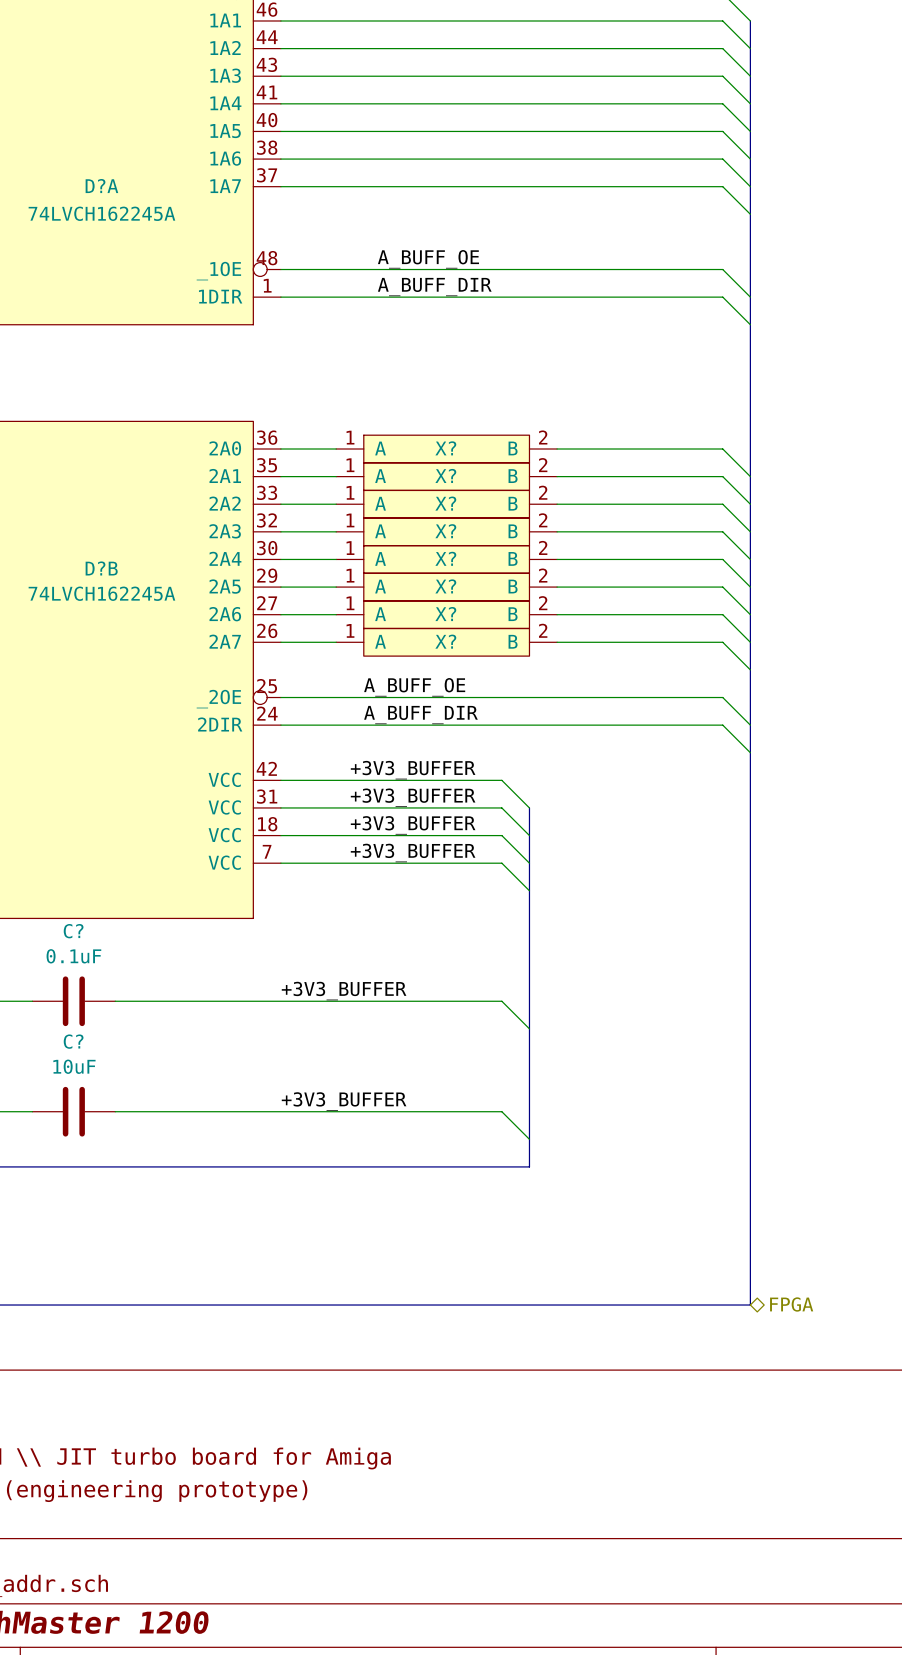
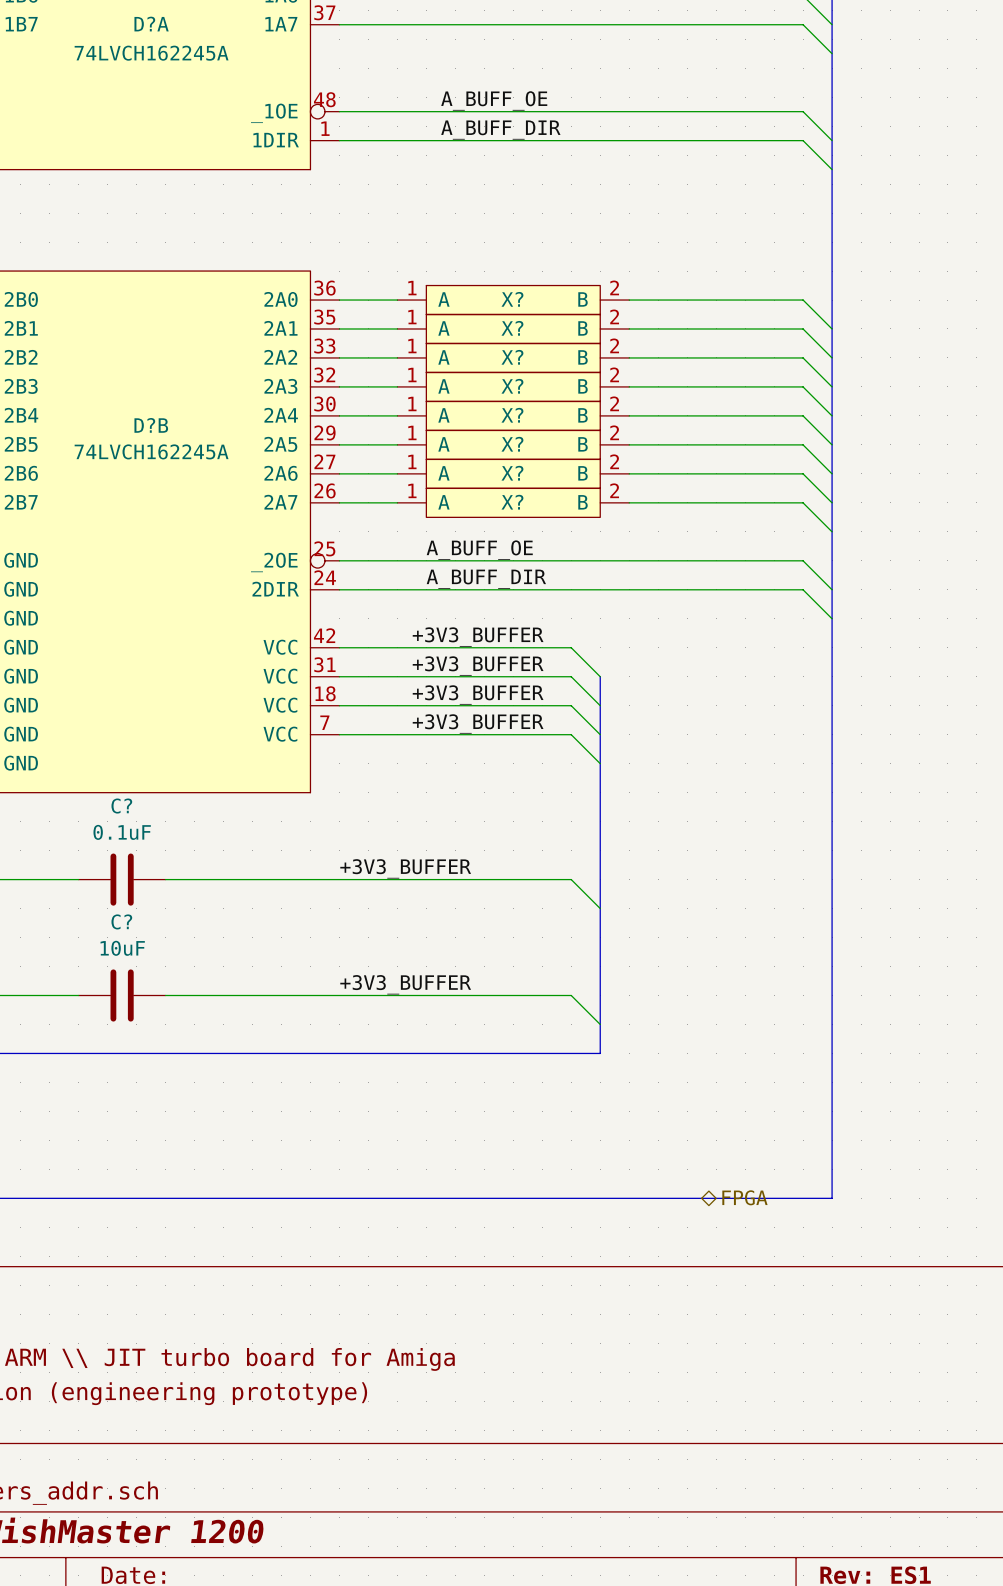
hierarchical label position: FPGA (791, 1304) -> FPGA (744, 1197)

